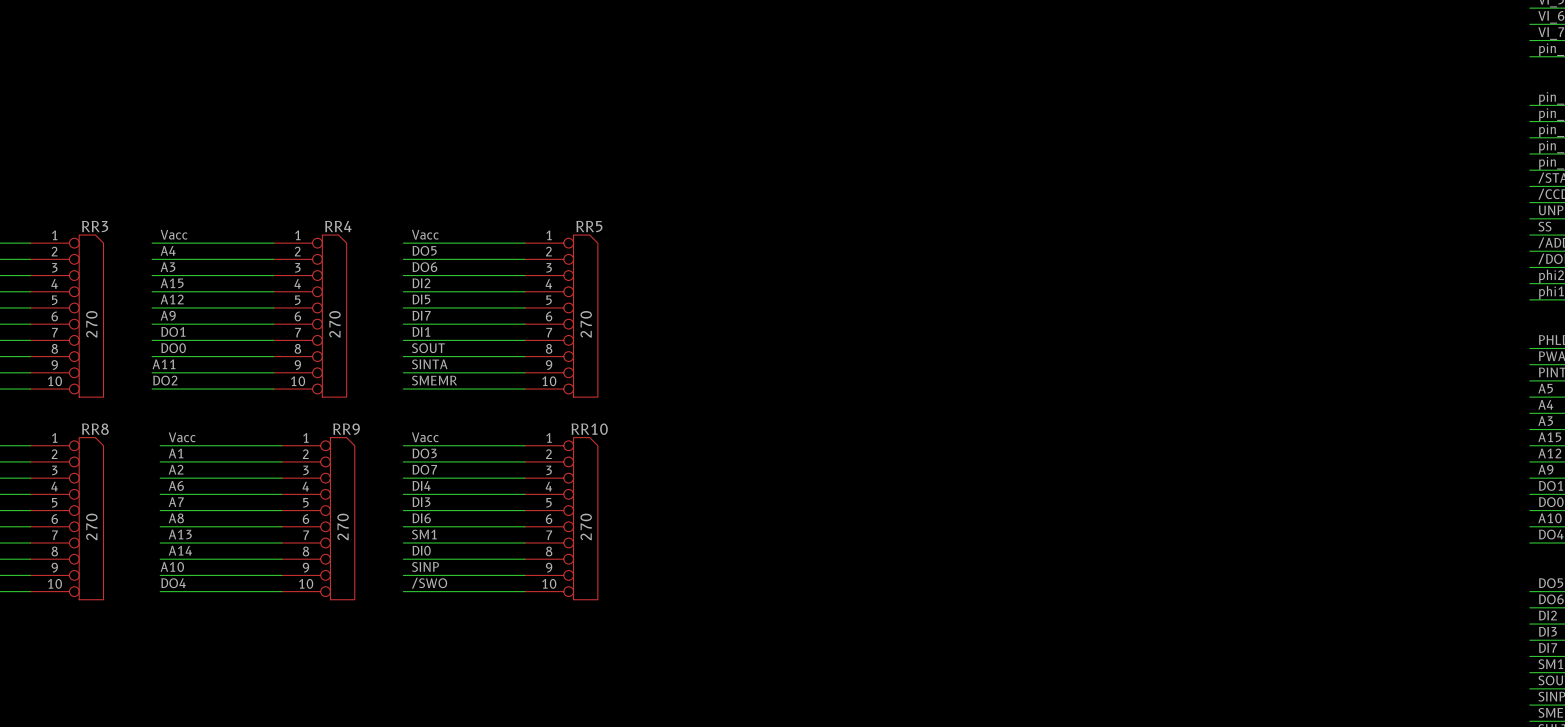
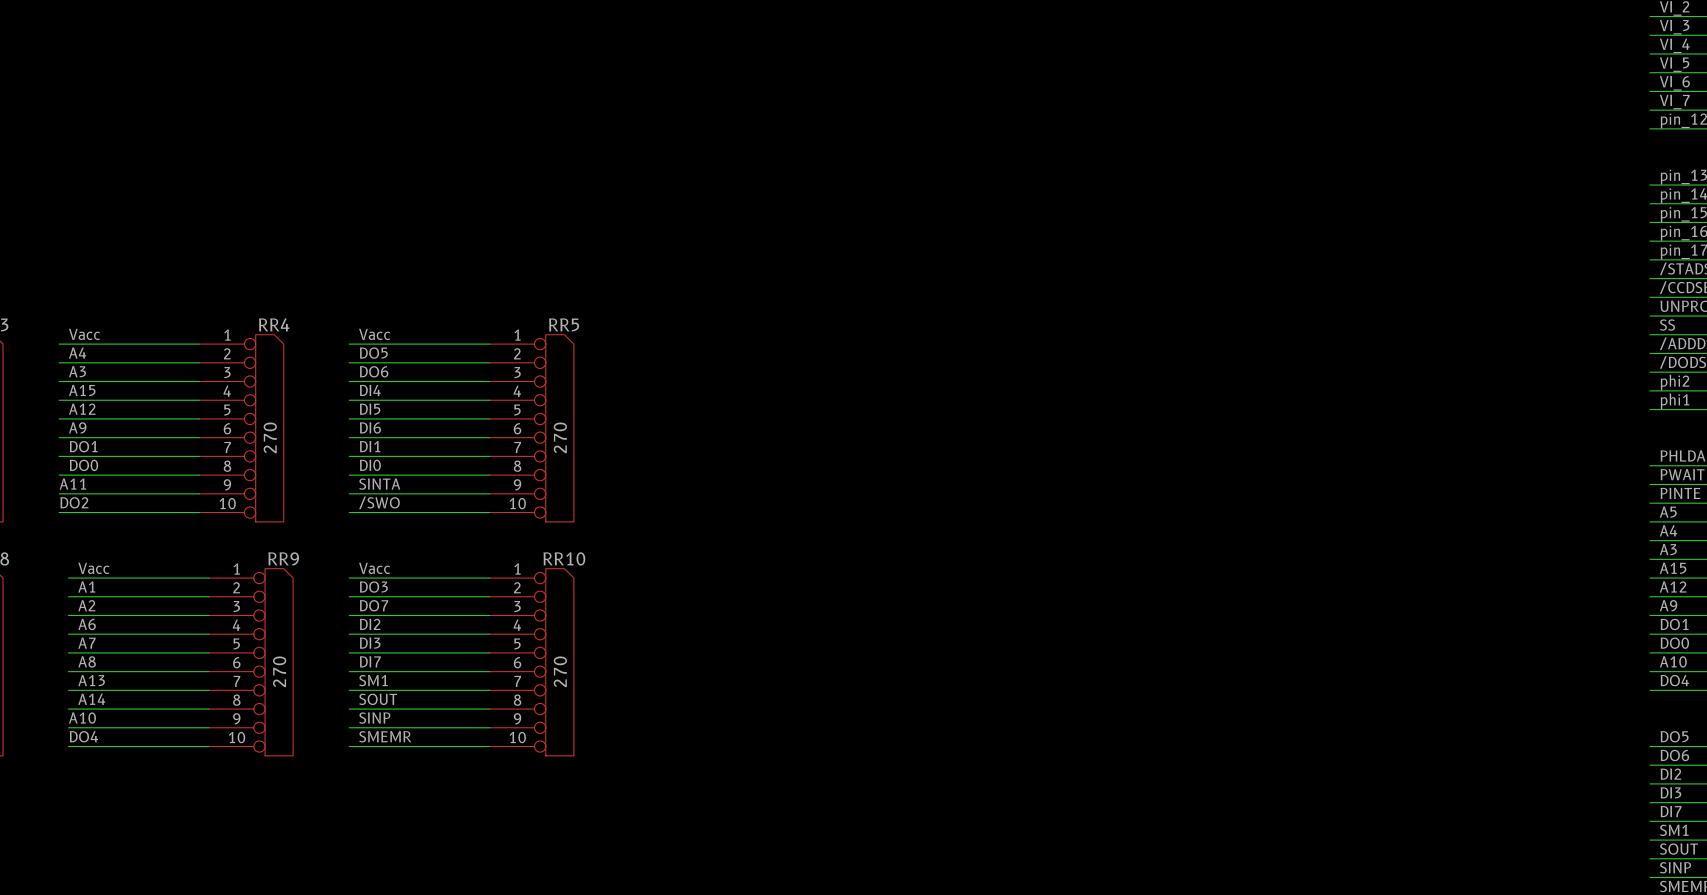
label: DI2 (421, 283) -> DI4 (370, 390)
label: DI7 (421, 315) -> DI6 (370, 427)
label: SOUT (428, 348) -> DI0 (370, 465)
label: SMEMR (434, 380) -> /SWO (379, 502)
label: DI4 (421, 485) -> DI2 (370, 624)
label: DI6 (421, 518) -> DI7 (370, 661)
label: DI0 (421, 550) -> SOUT (378, 699)
label: /SWO (429, 583) -> SMEMR (385, 736)

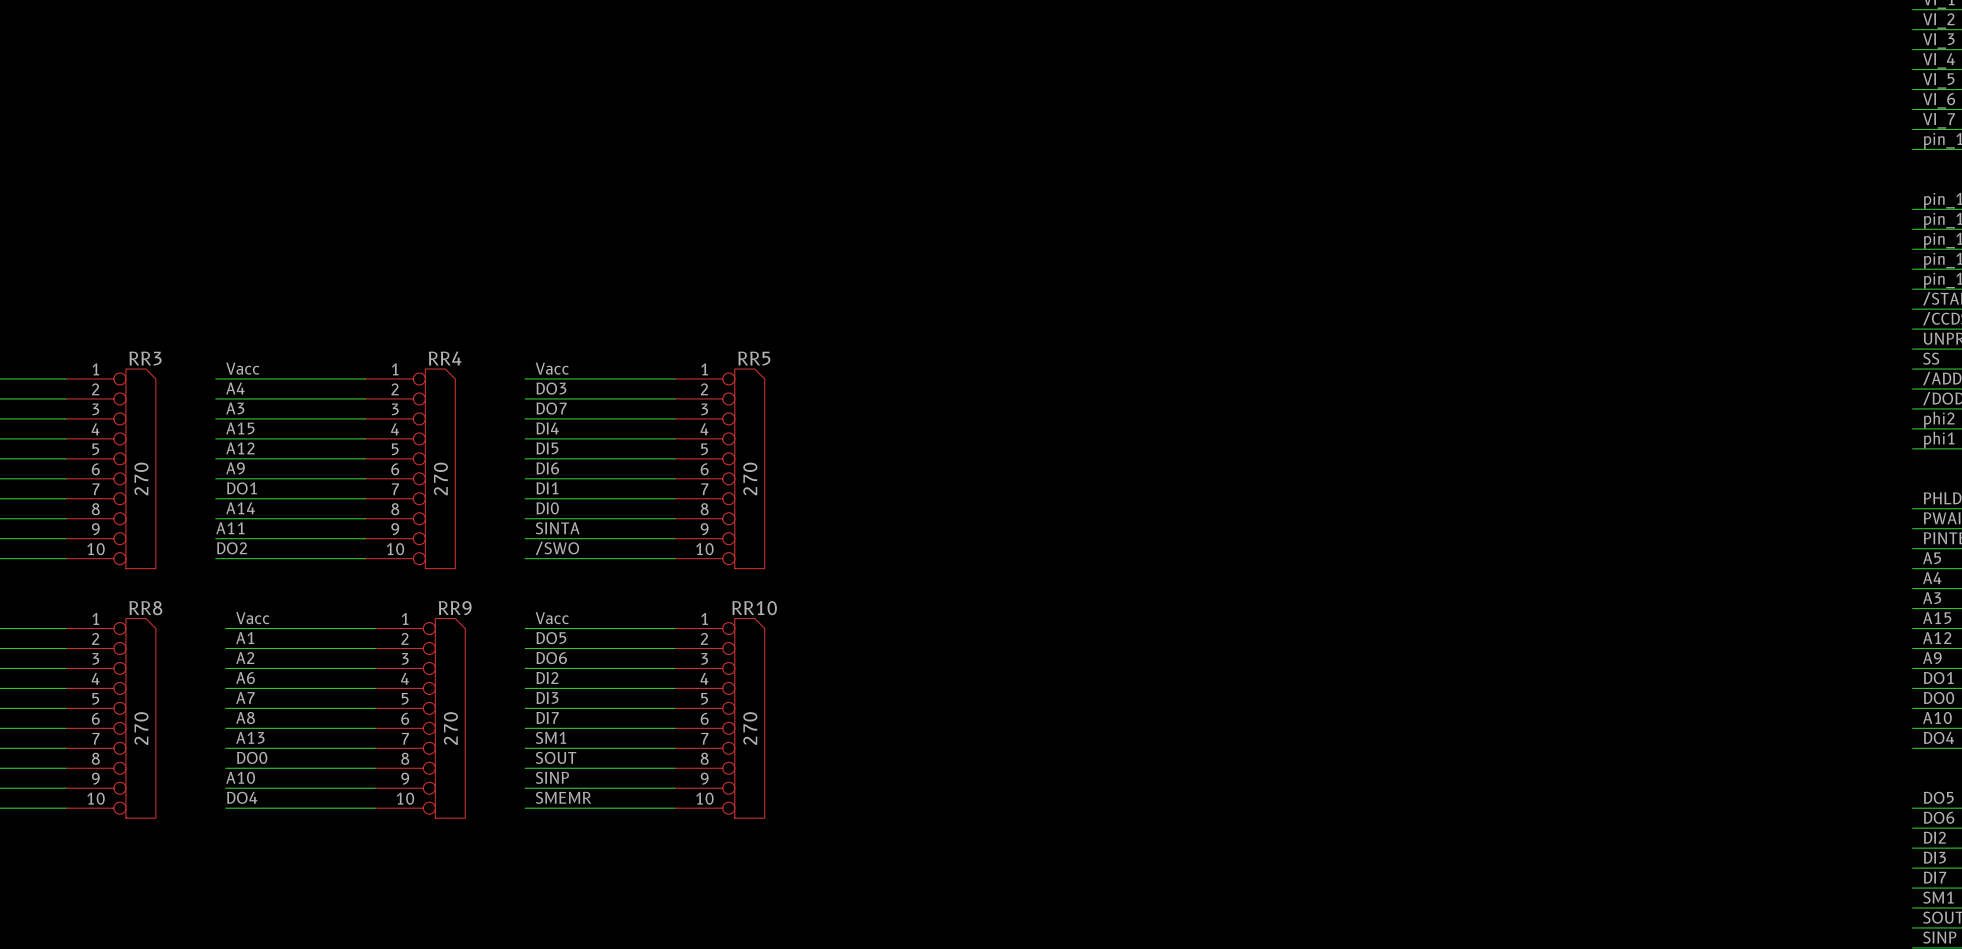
label: DO5 (373, 353) -> DO3 (551, 388)
label: DO6 (374, 371) -> DO7 (551, 408)
label: DO0 (83, 465) -> A14 (240, 508)
label: DO3 (373, 587) -> DO5 (551, 638)
label: DO7 (374, 605) -> DO6 (551, 658)
label: A14 (91, 699) -> DO0 (252, 757)

